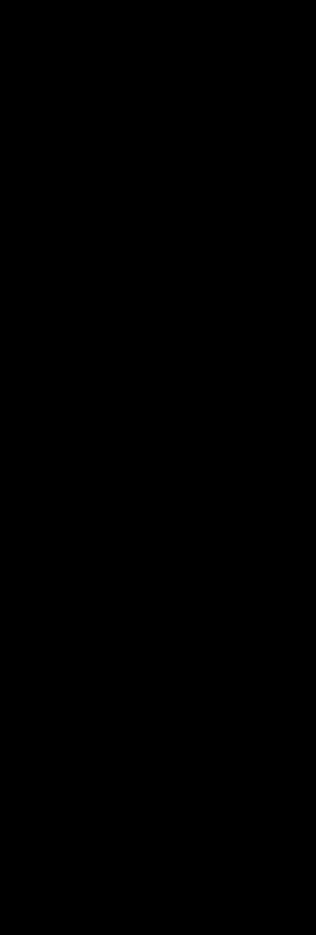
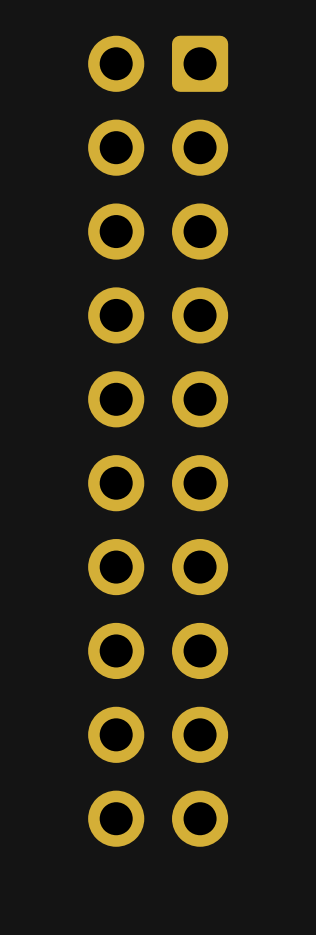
part: none -> (158, 441)

